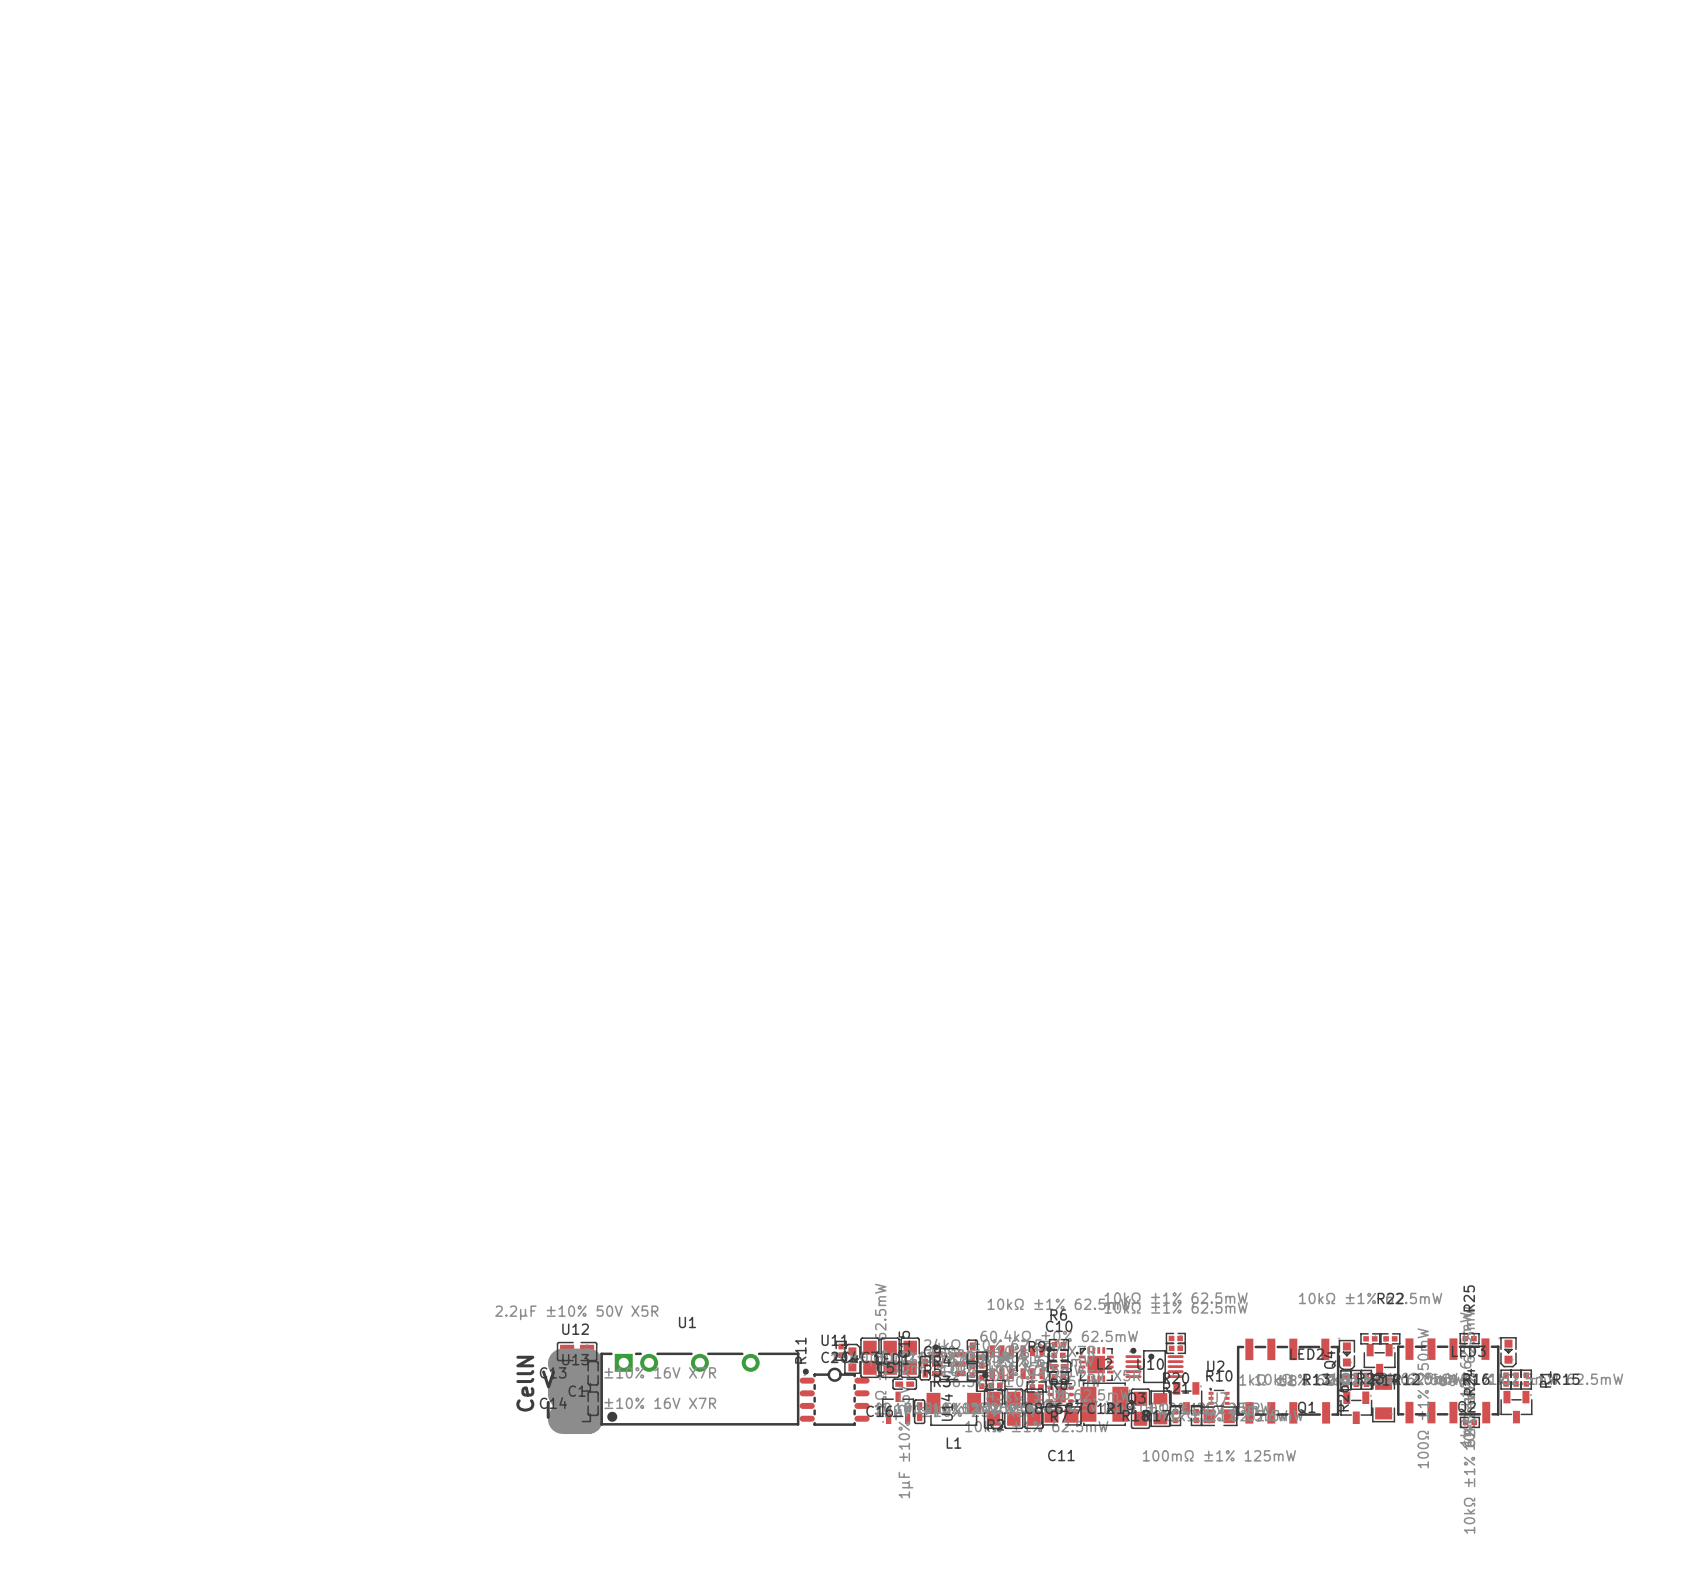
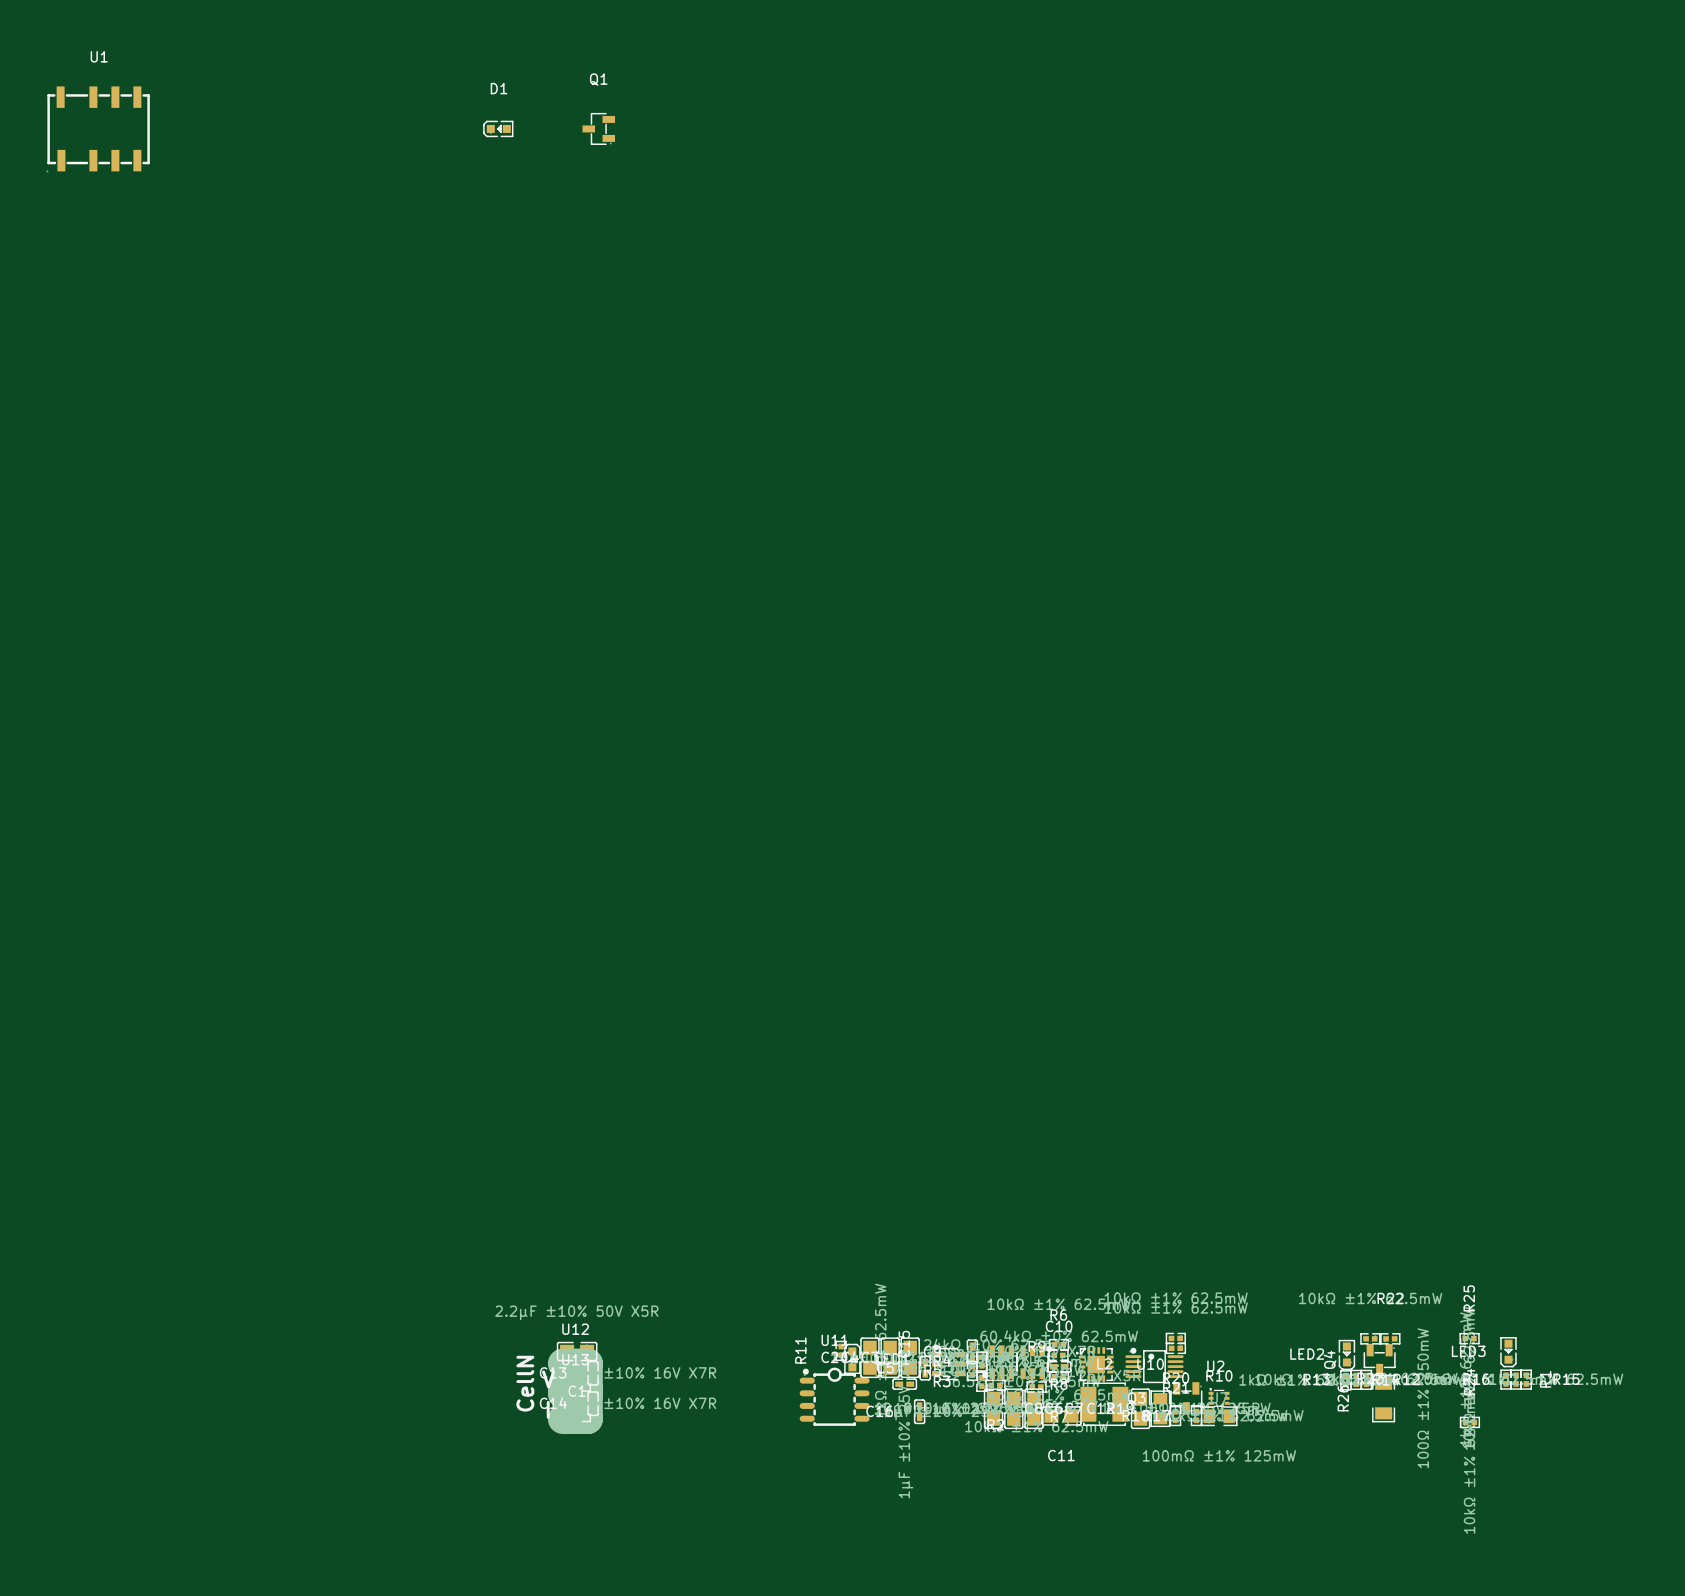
D1: none -> (498, 128)
U1 footprint: [600, 1352, 800, 1426] -> [46, 86, 150, 173]
part: (1288, 1380) -> none
part: (1448, 1380) -> none
part: (1062, 1394) -> none
L1: (953, 1403) -> none
U14: (898, 1407) -> none
Q1 rotation: 0° (1356, 1407) -> 90° clockwise (598, 128)
Q1 position: (1356, 1407) -> (598, 128)
Q2: (1516, 1407) -> none

